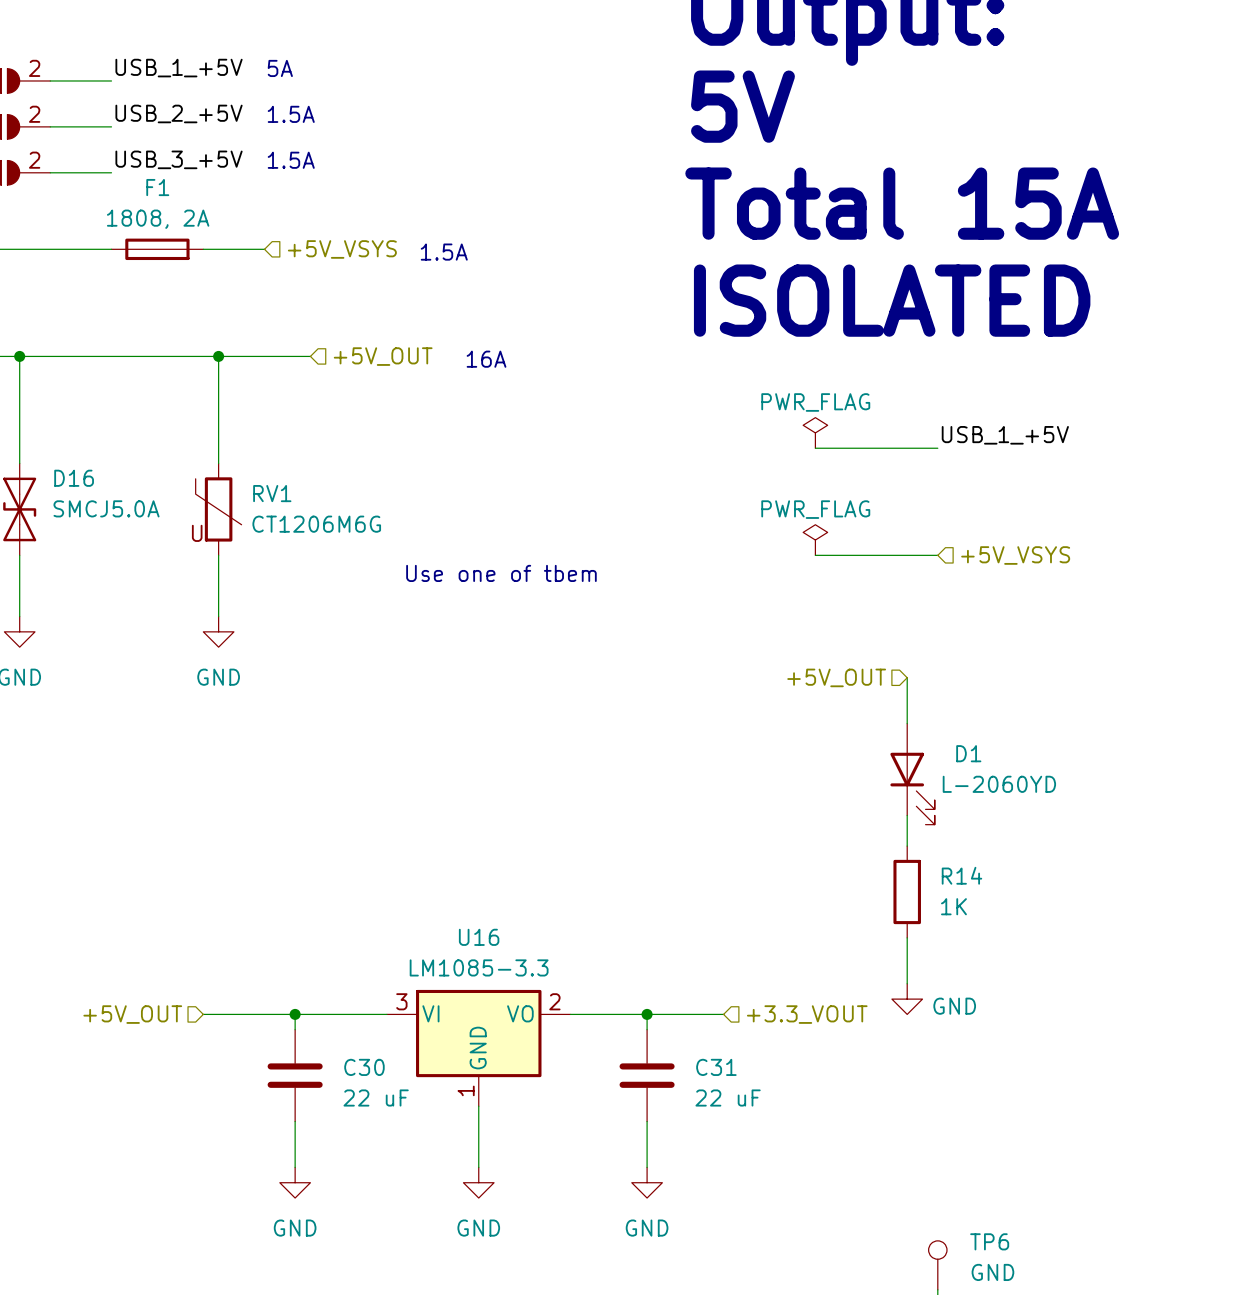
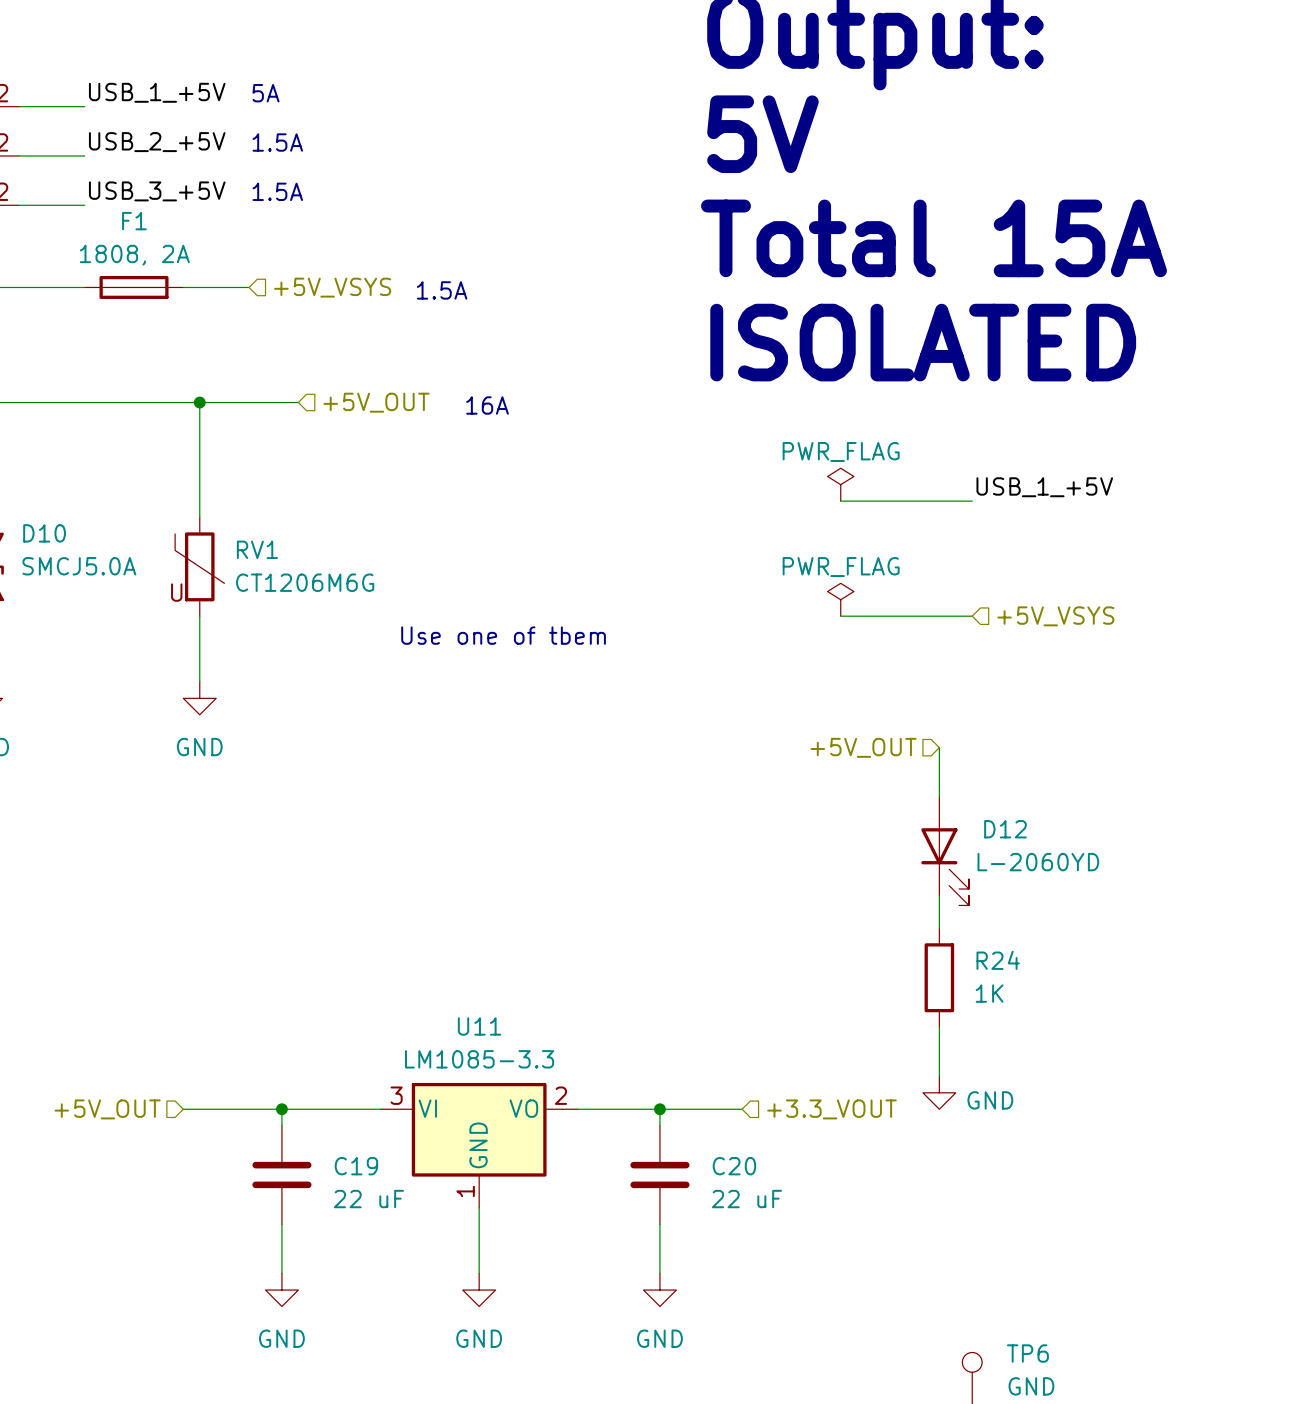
D16 name: D16 (74, 478) -> D10 (44, 533)
D1 name: D1 (968, 753) -> D12 (1005, 829)
R14 name: R14 (961, 875) -> R24 (998, 960)
U16 name: U16 (479, 937) -> U11 (479, 1026)
C30 name: C30 (364, 1067) -> C19 (356, 1166)
C31 name: C31 (716, 1067) -> C20 (734, 1166)

